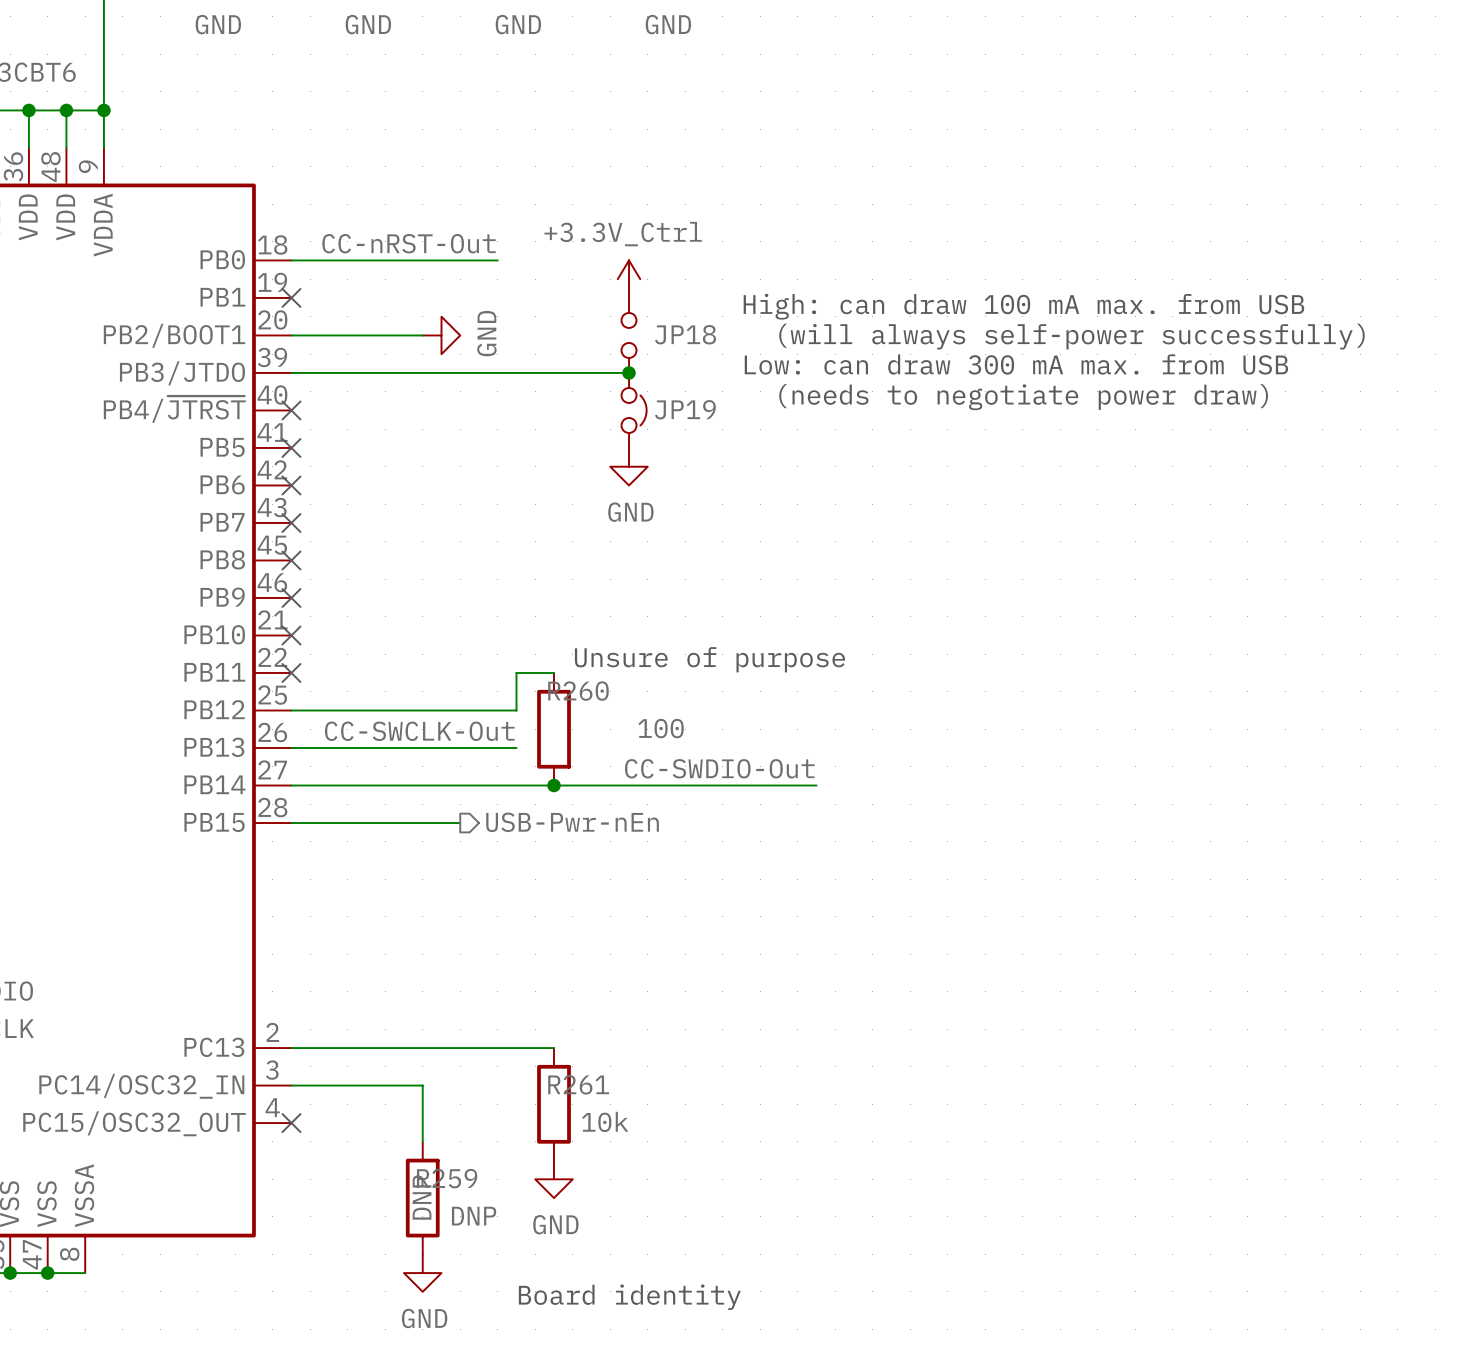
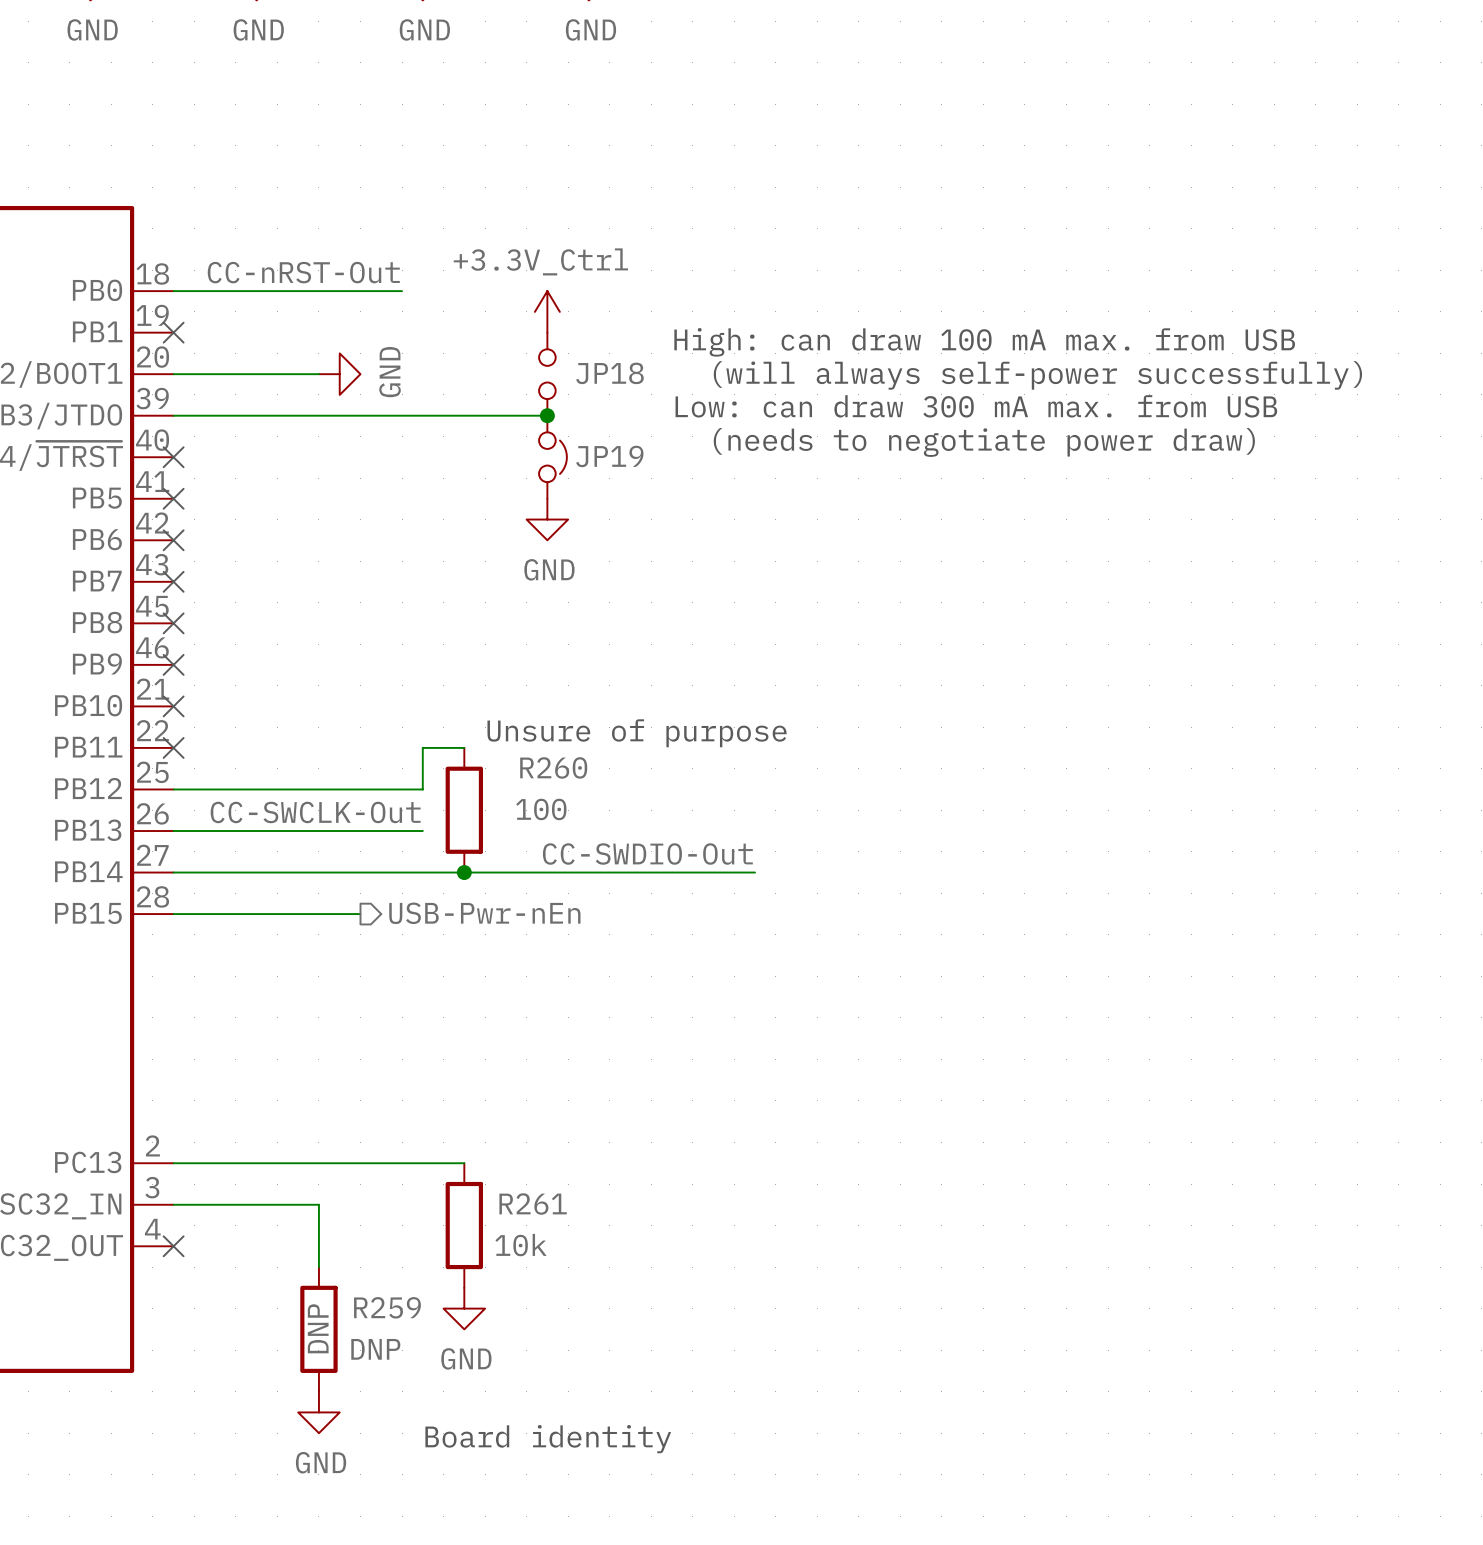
R260 name position: R260 (578, 691) -> R260 (553, 767)
R260 value position: 100 (661, 728) -> 100 (541, 809)
R261 name position: R261 (578, 1084) -> R261 (533, 1203)
R259 name position: R259 (447, 1178) -> R259 (387, 1307)

